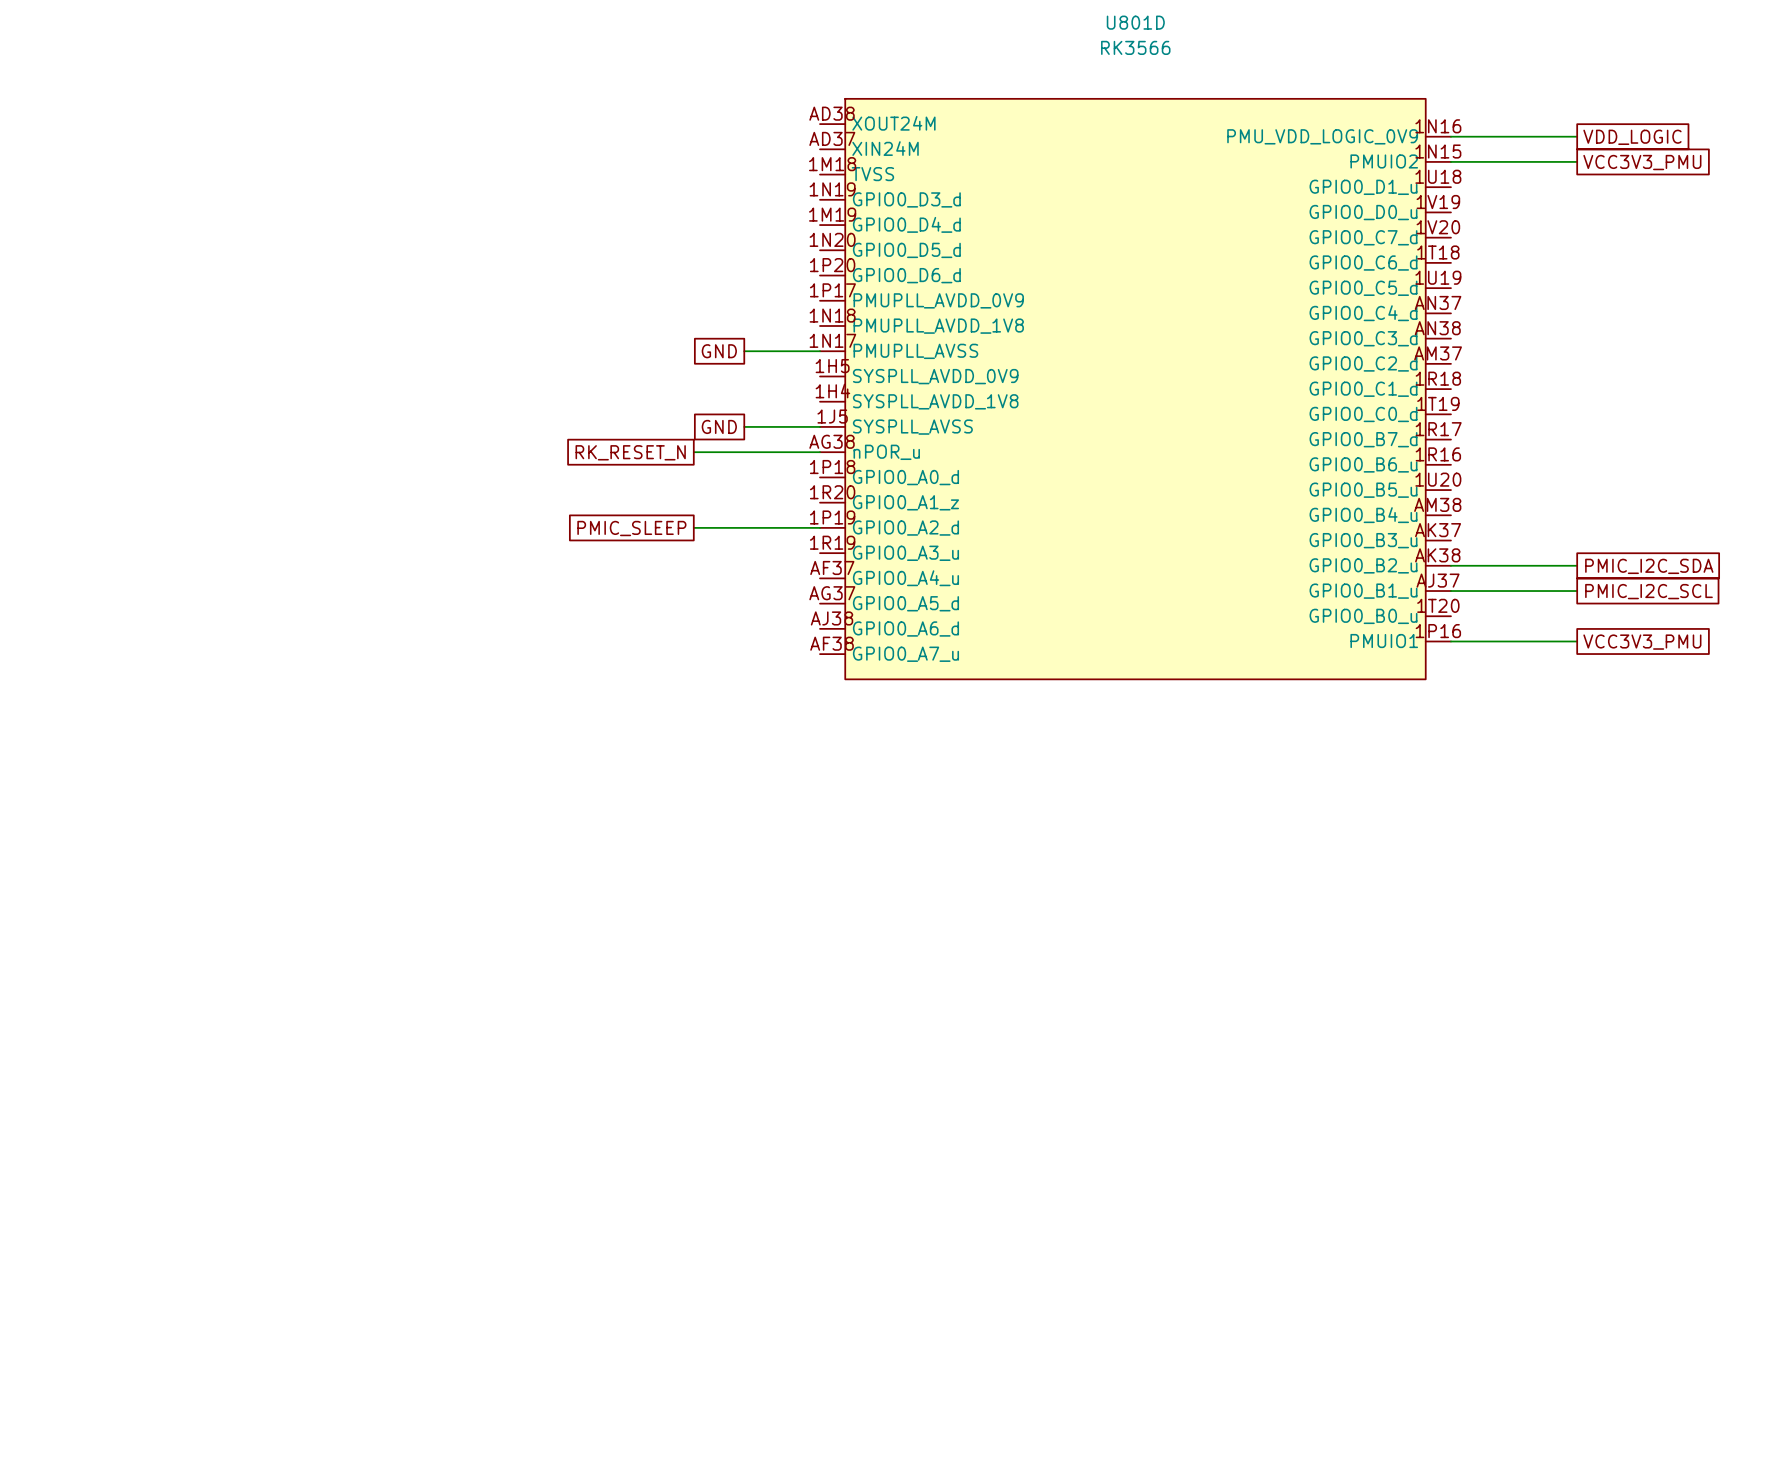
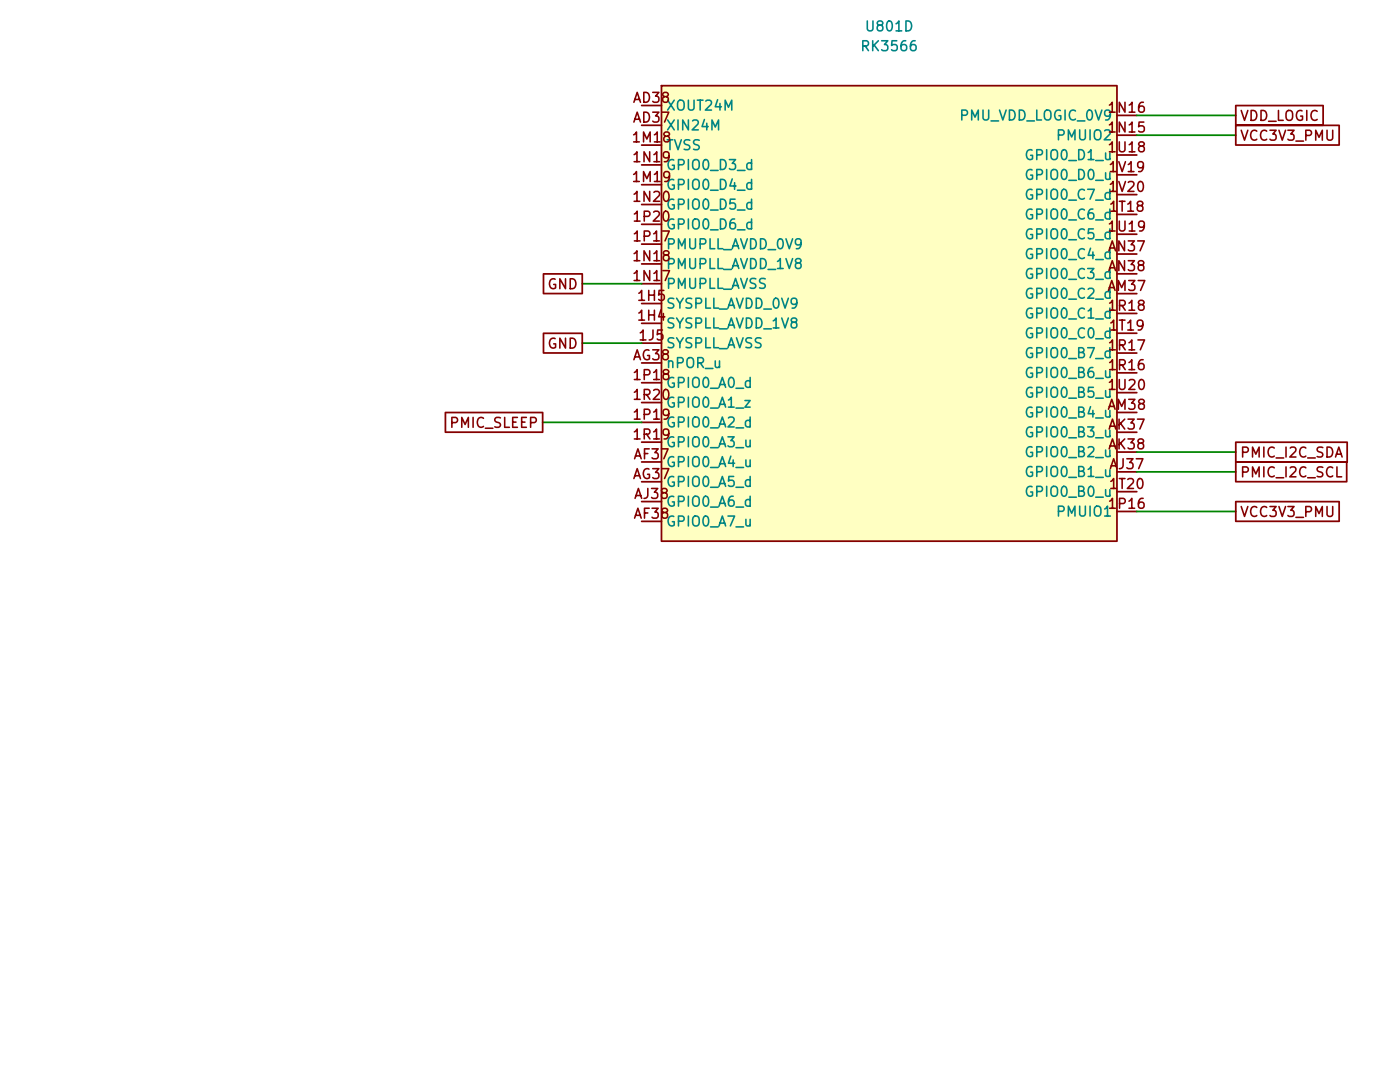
global label: RK_RESET_N (630, 452) -> none
wire: (693, 452) (819, 452) -> none

